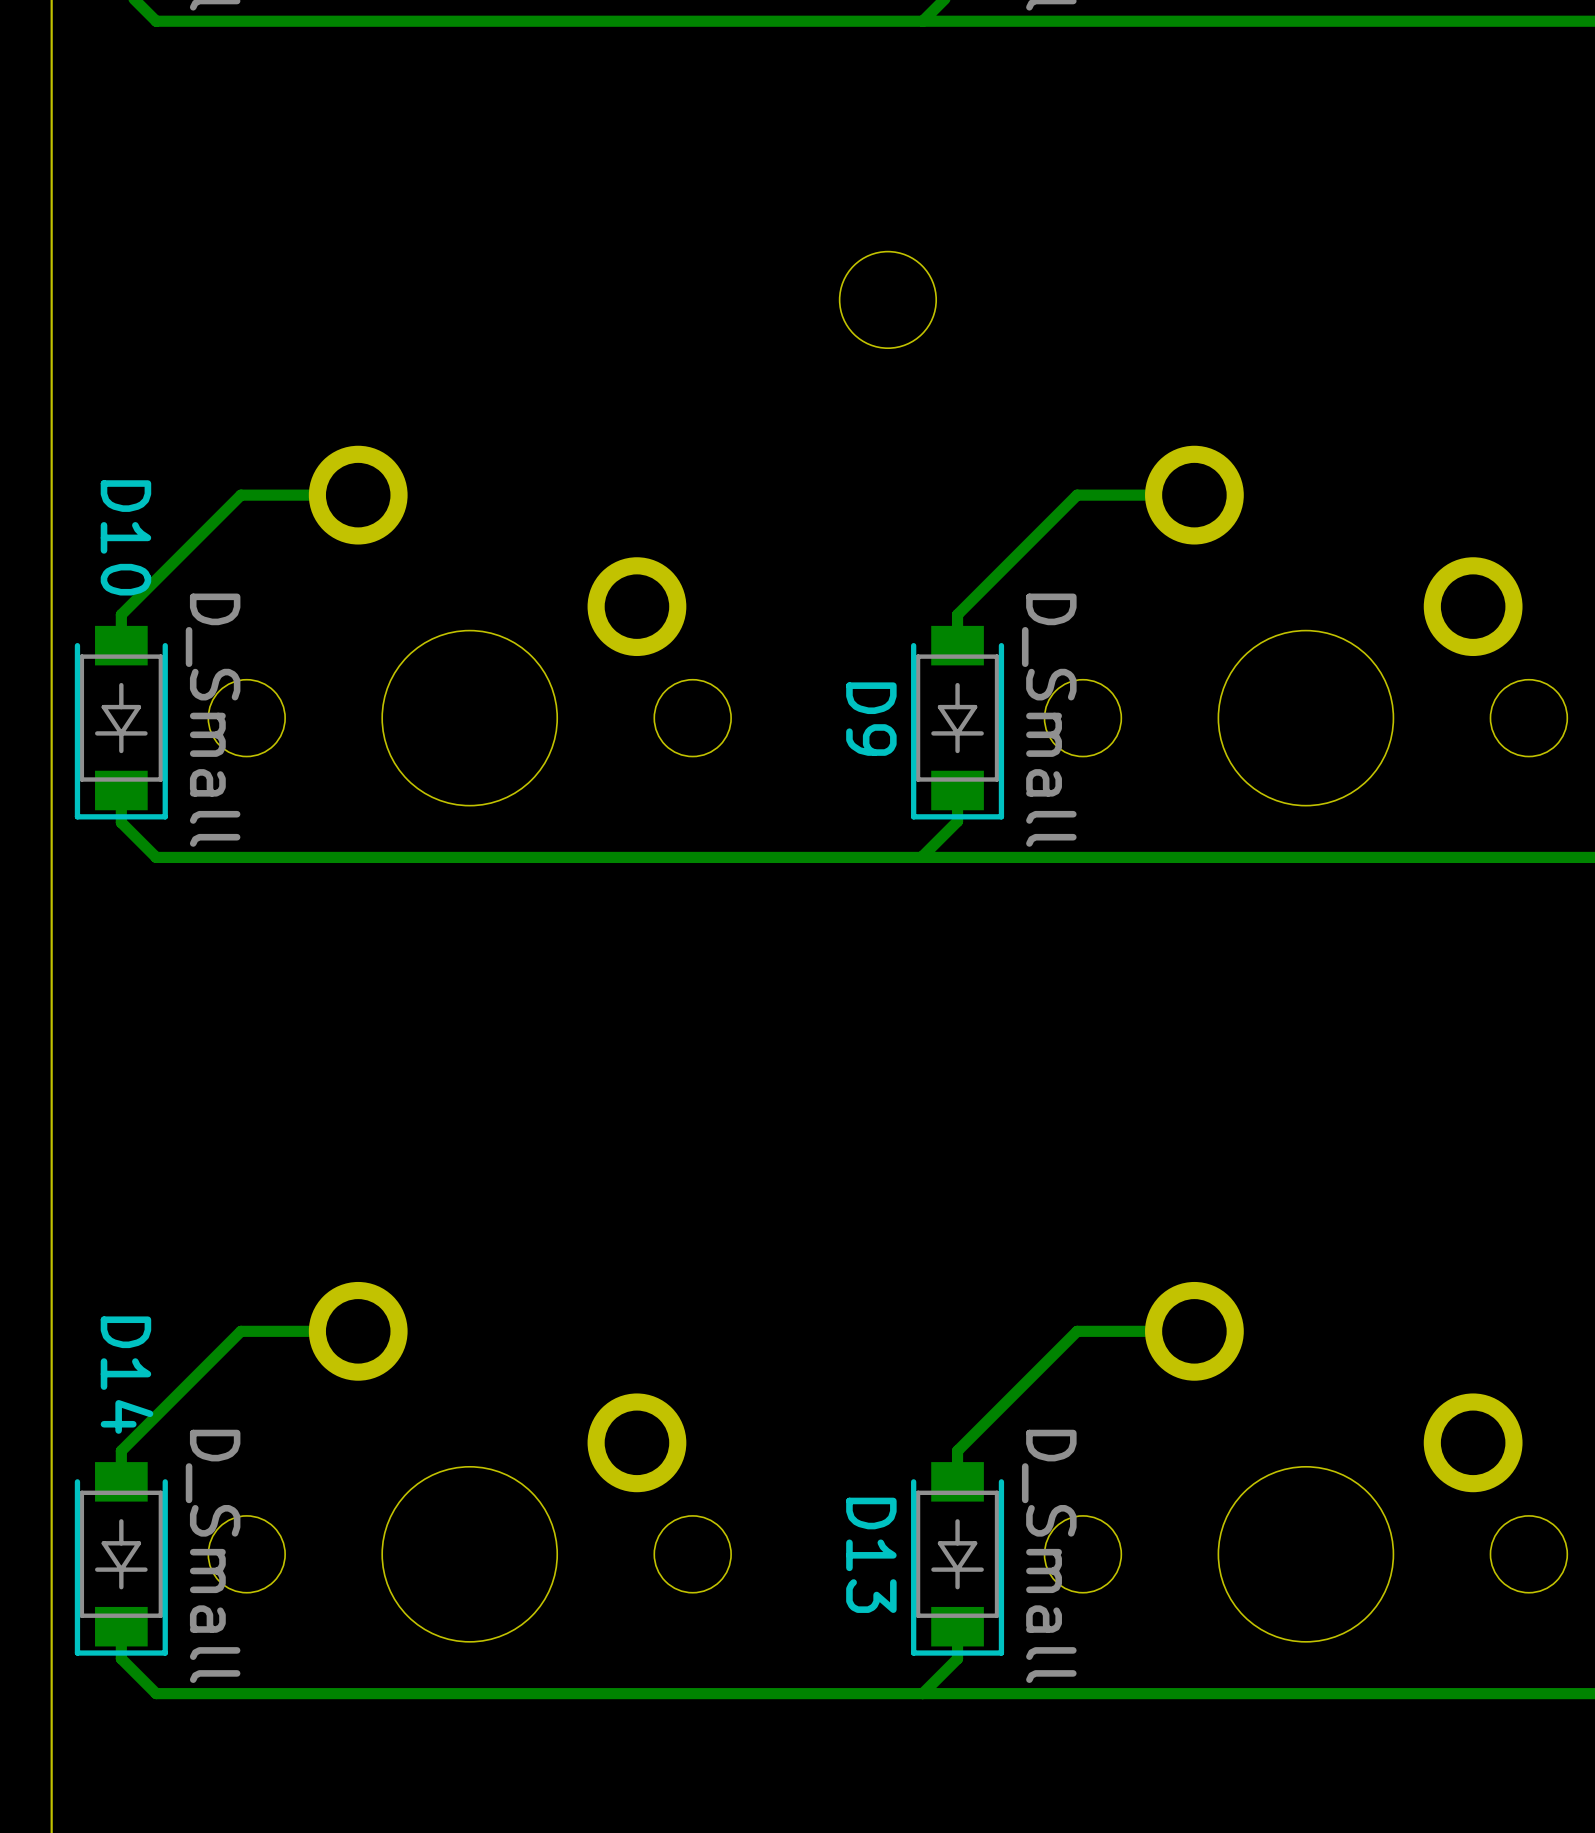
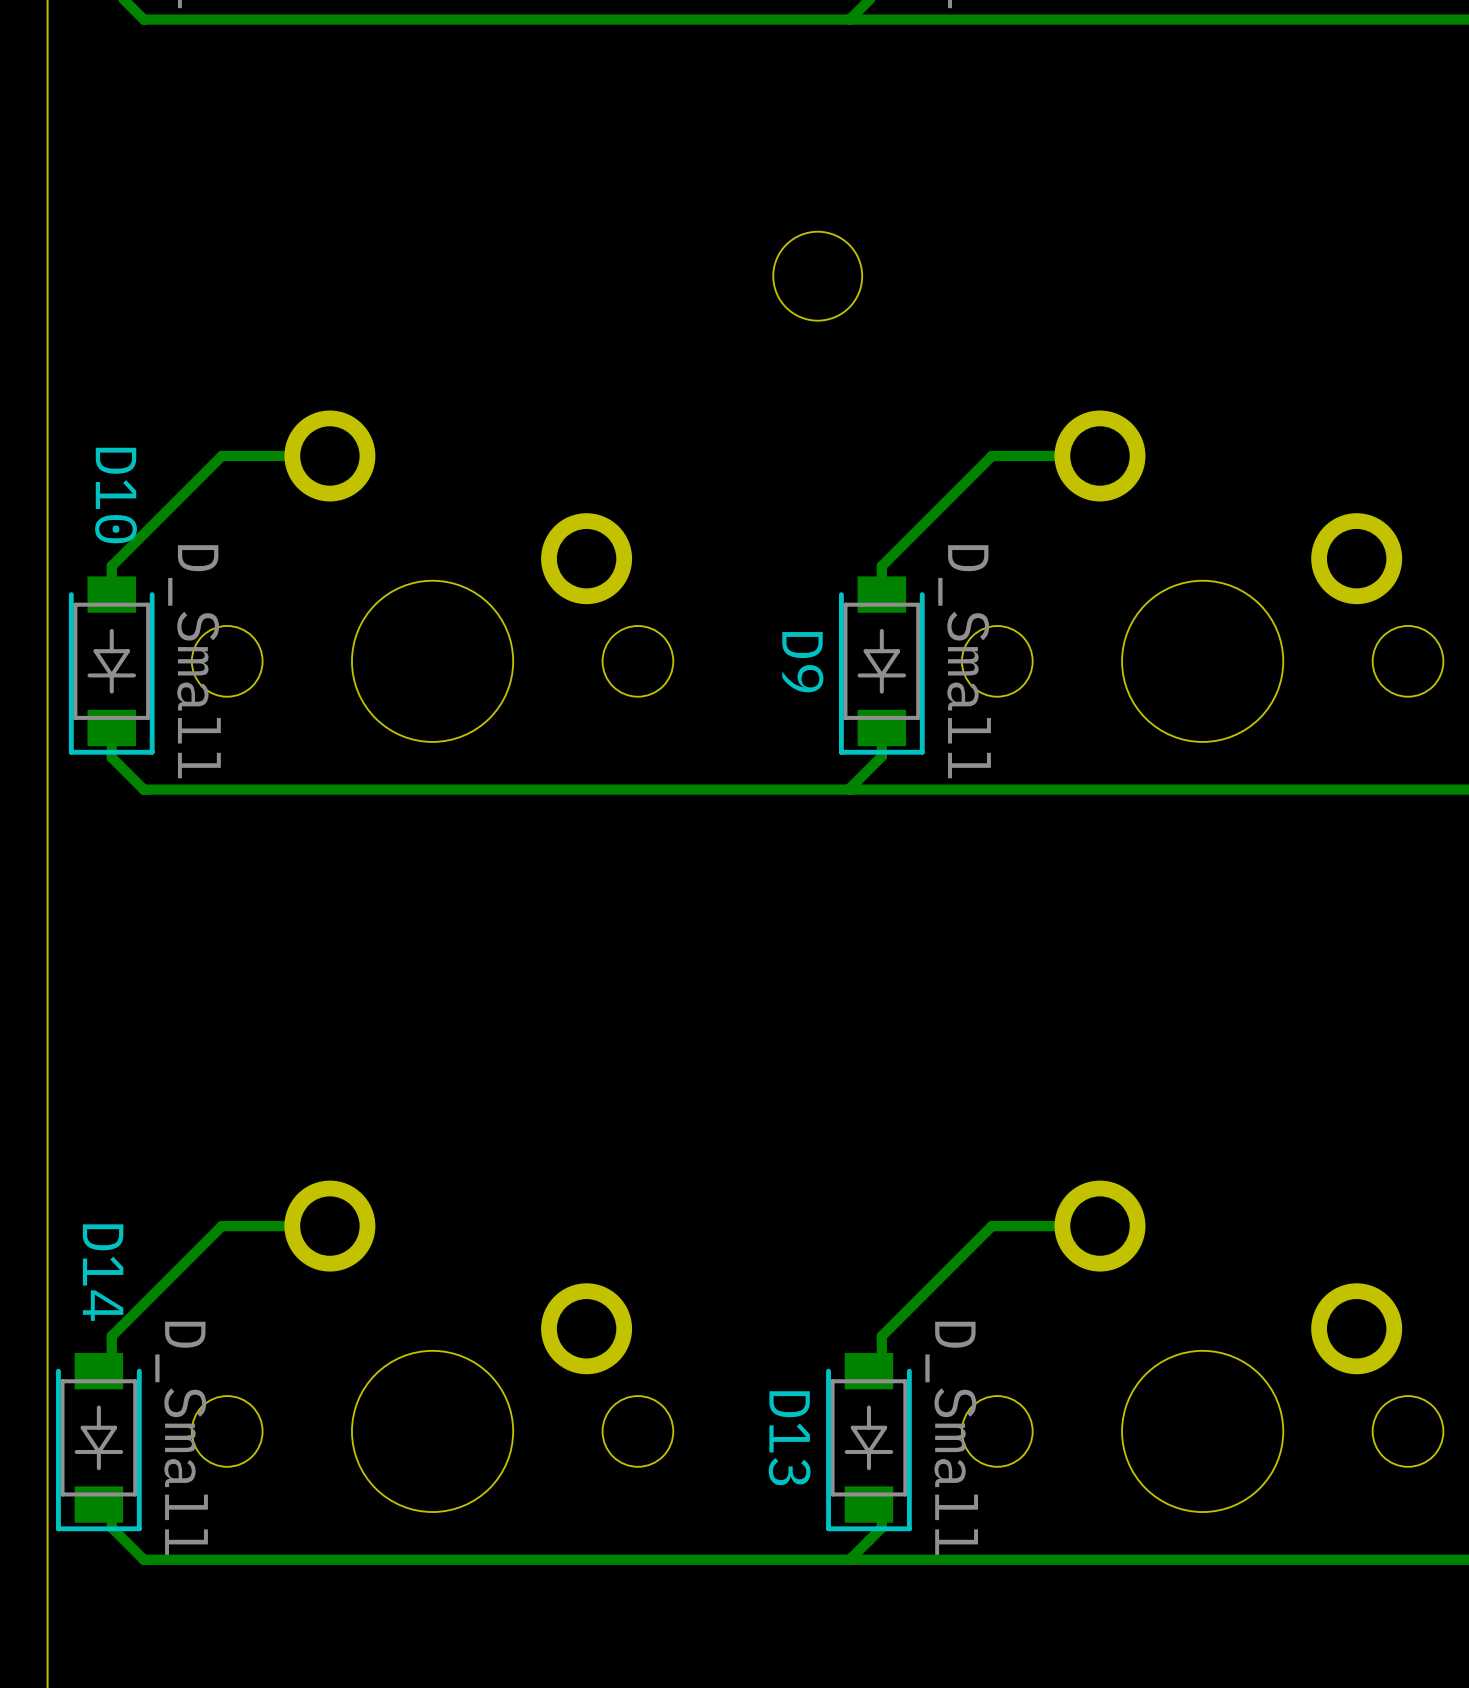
D14 position: (121, 1558) -> (98, 1442)
D13 position: (957, 1558) -> (868, 1442)

